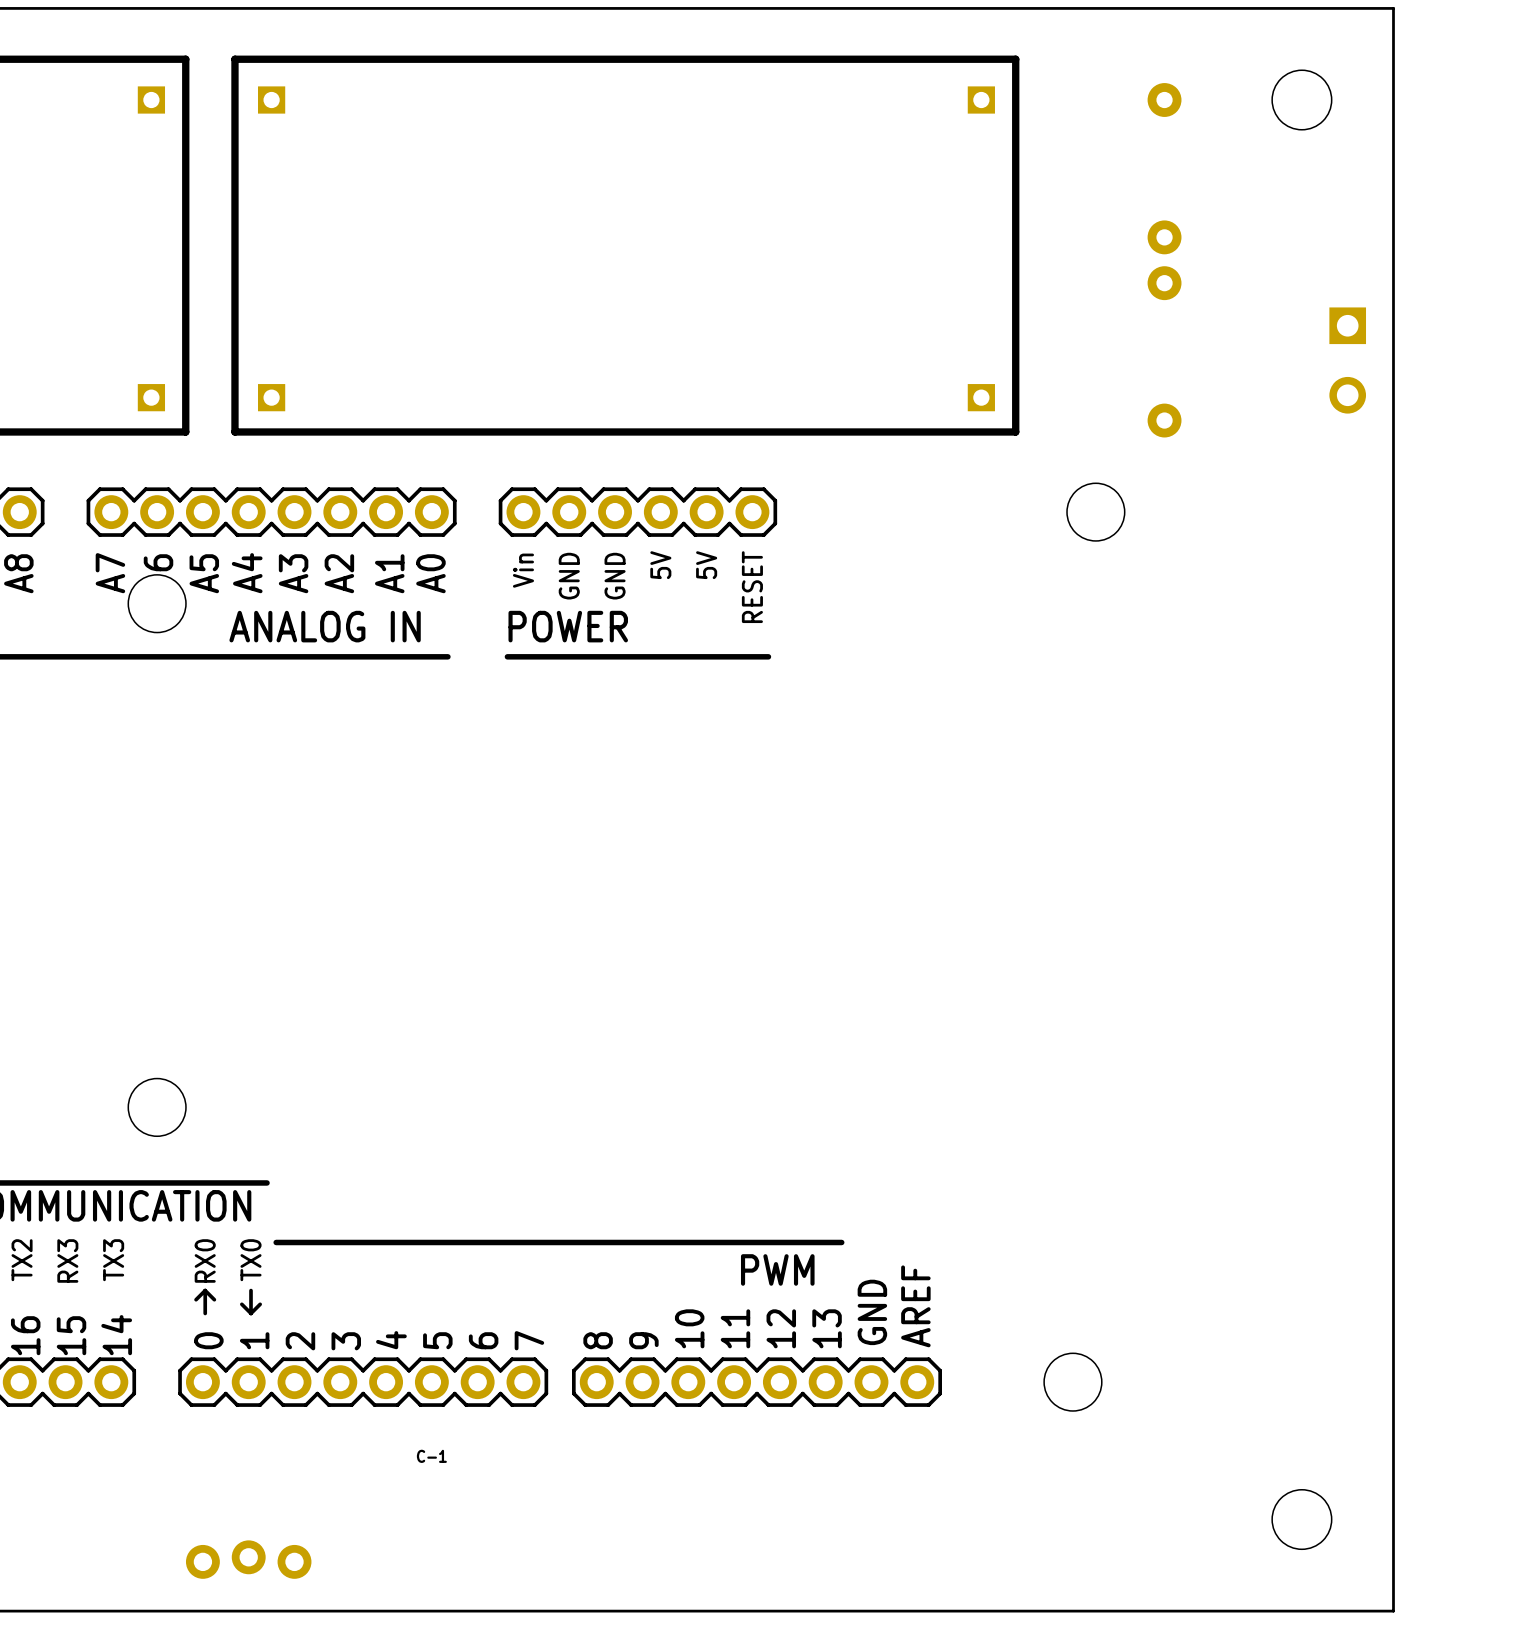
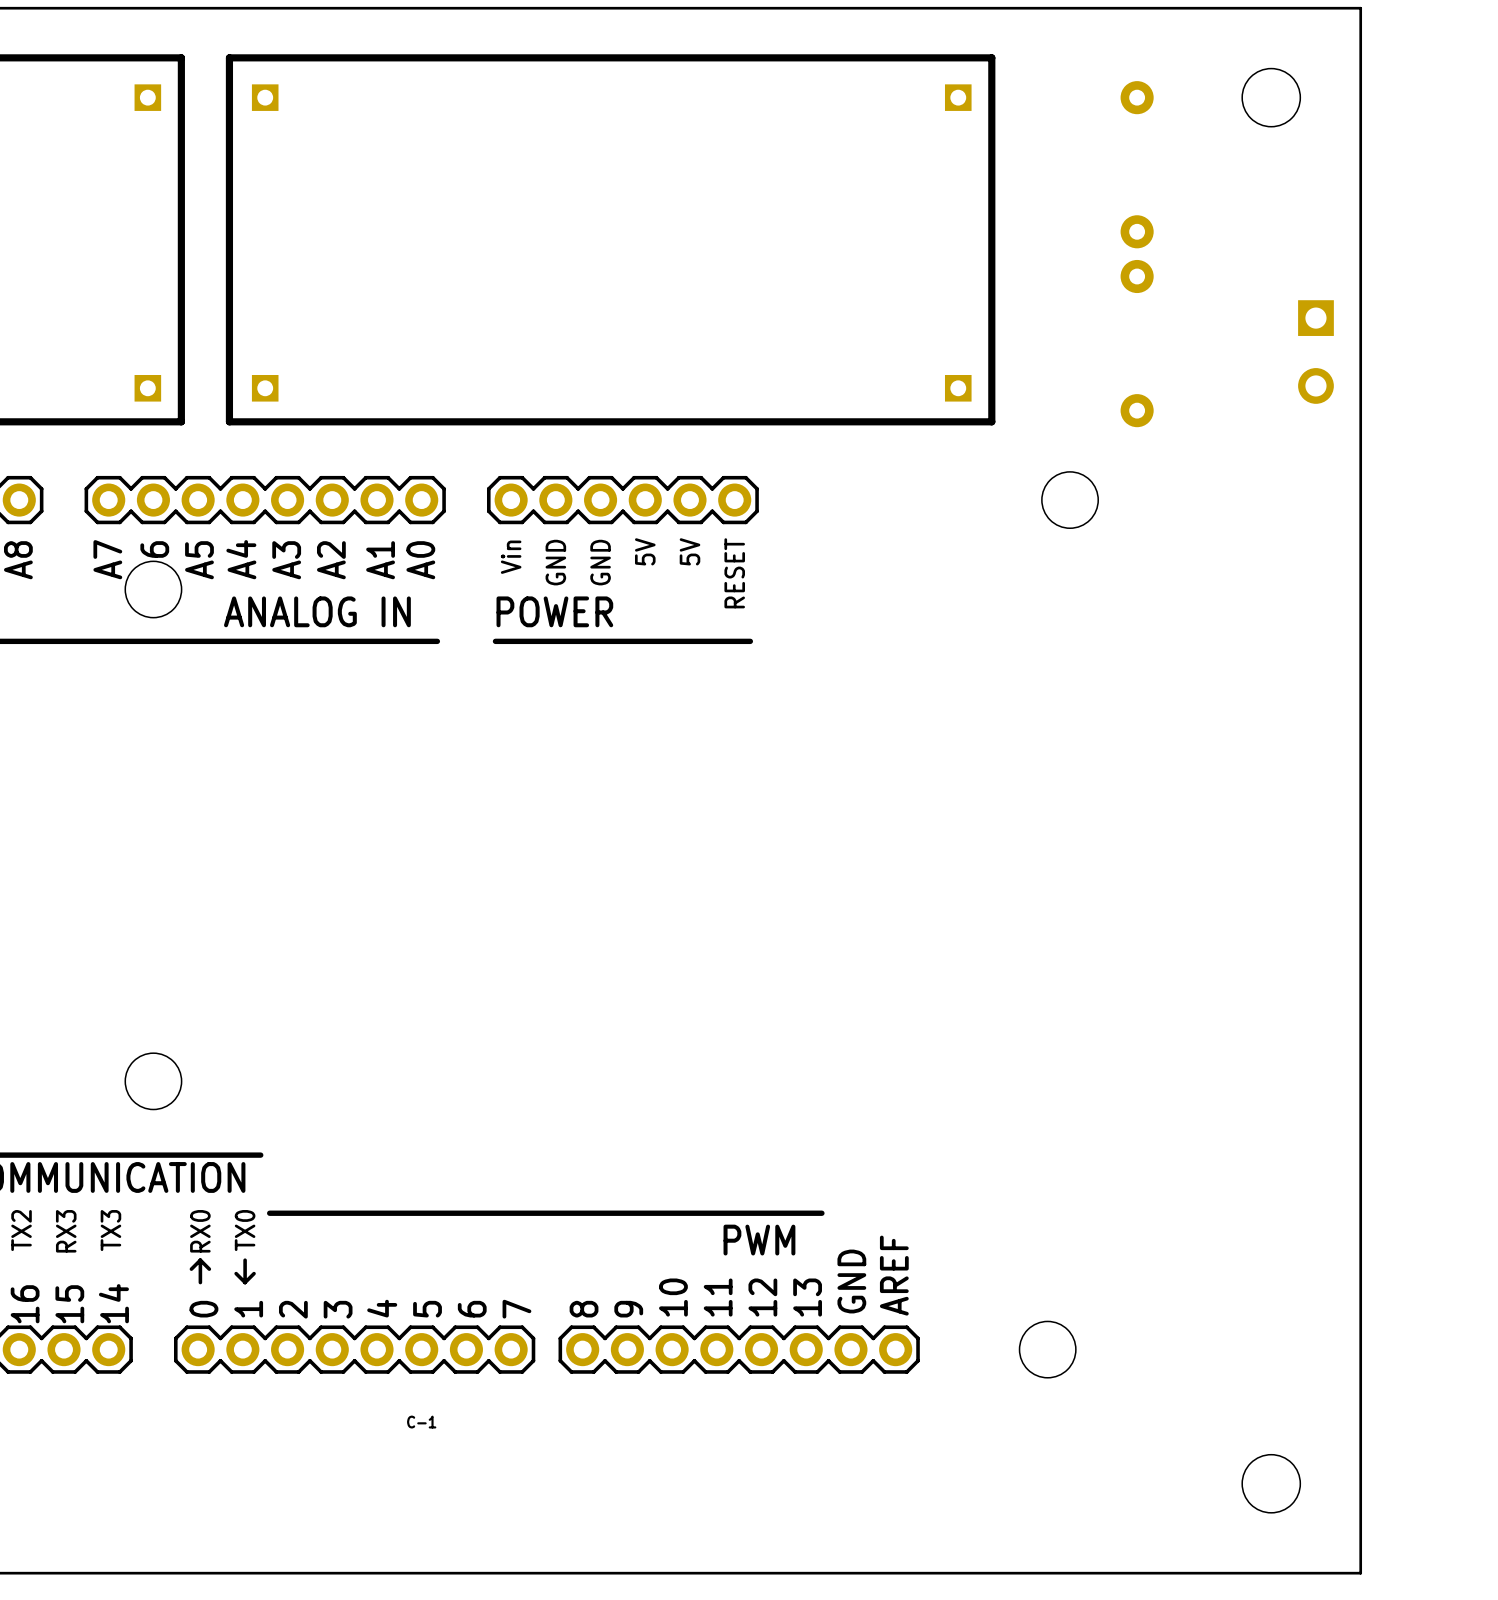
part: (248, 1559) -> none

